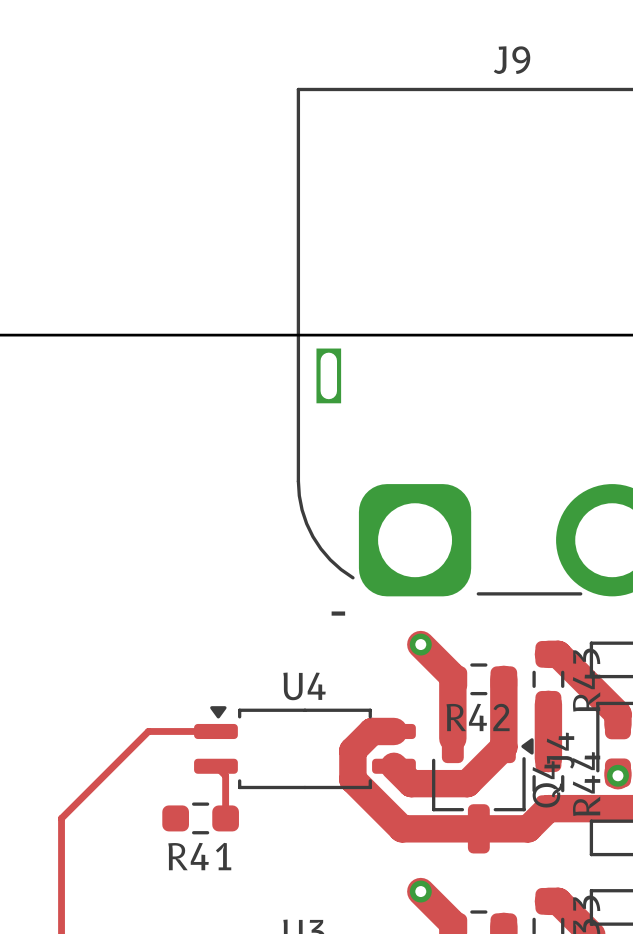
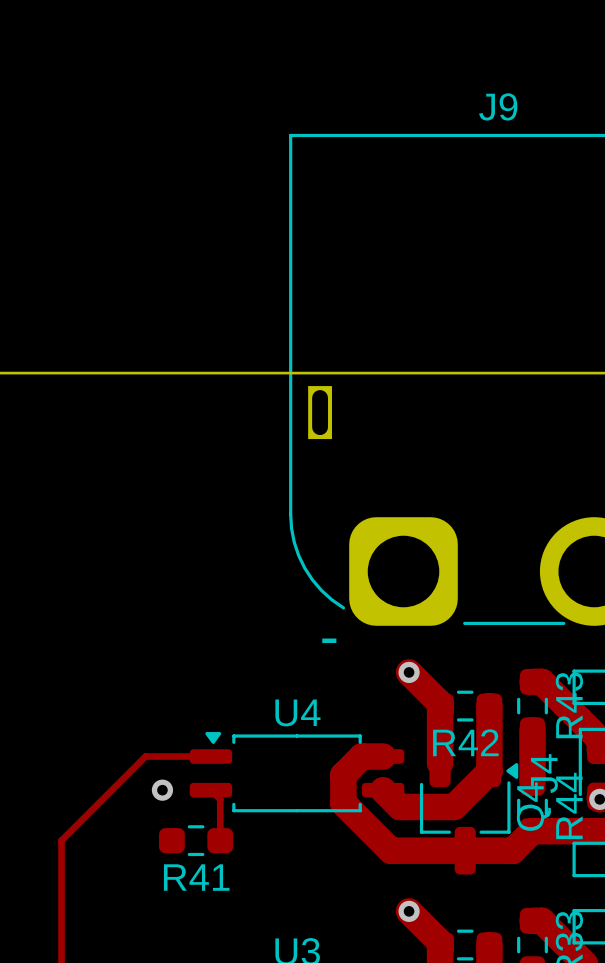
via: none -> (162, 790)

